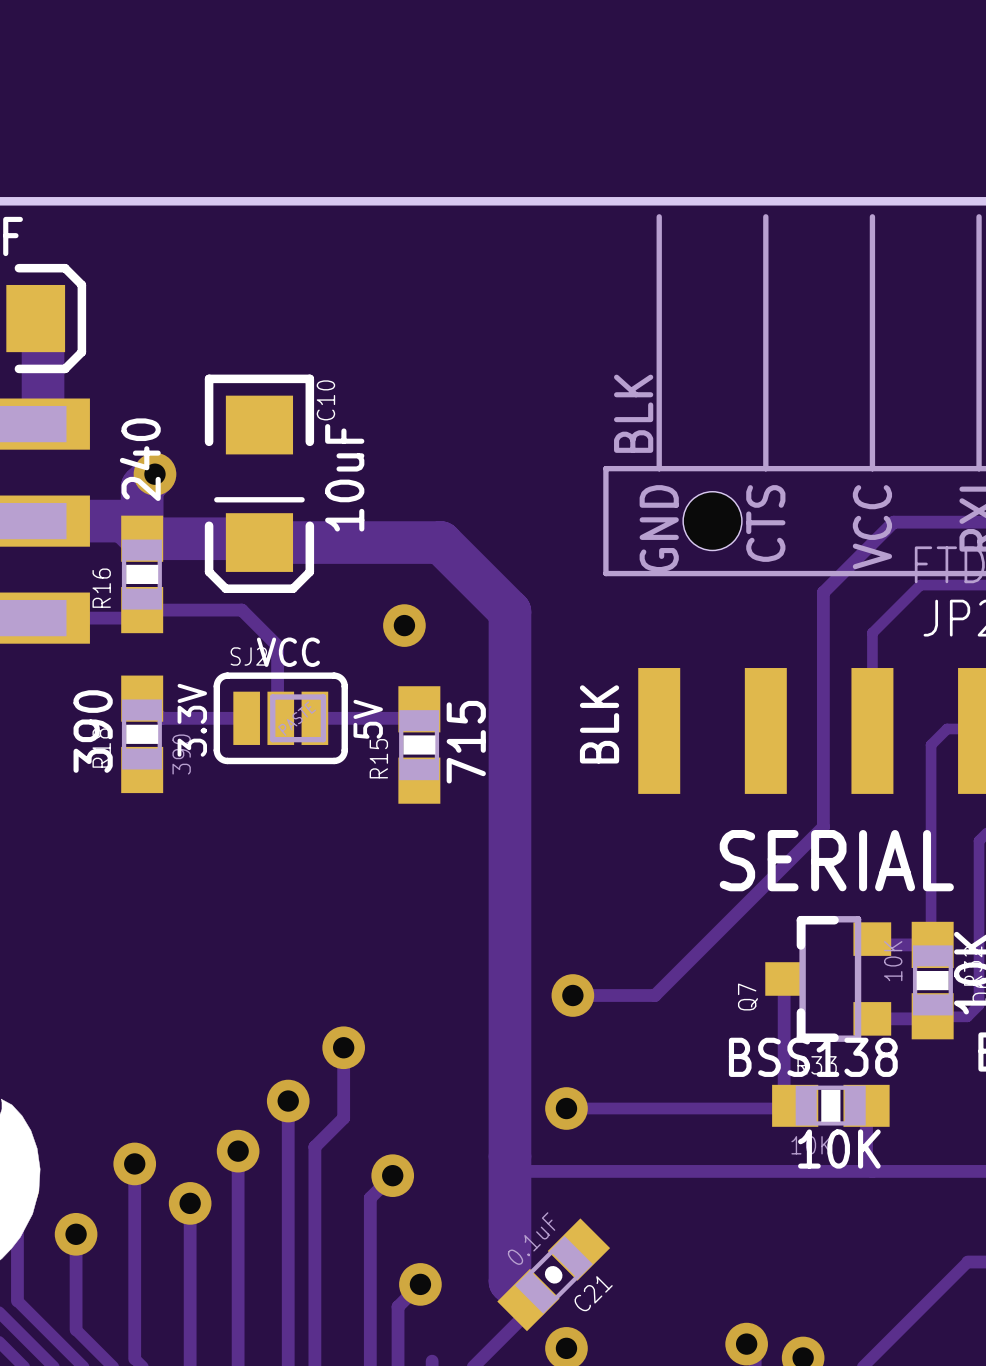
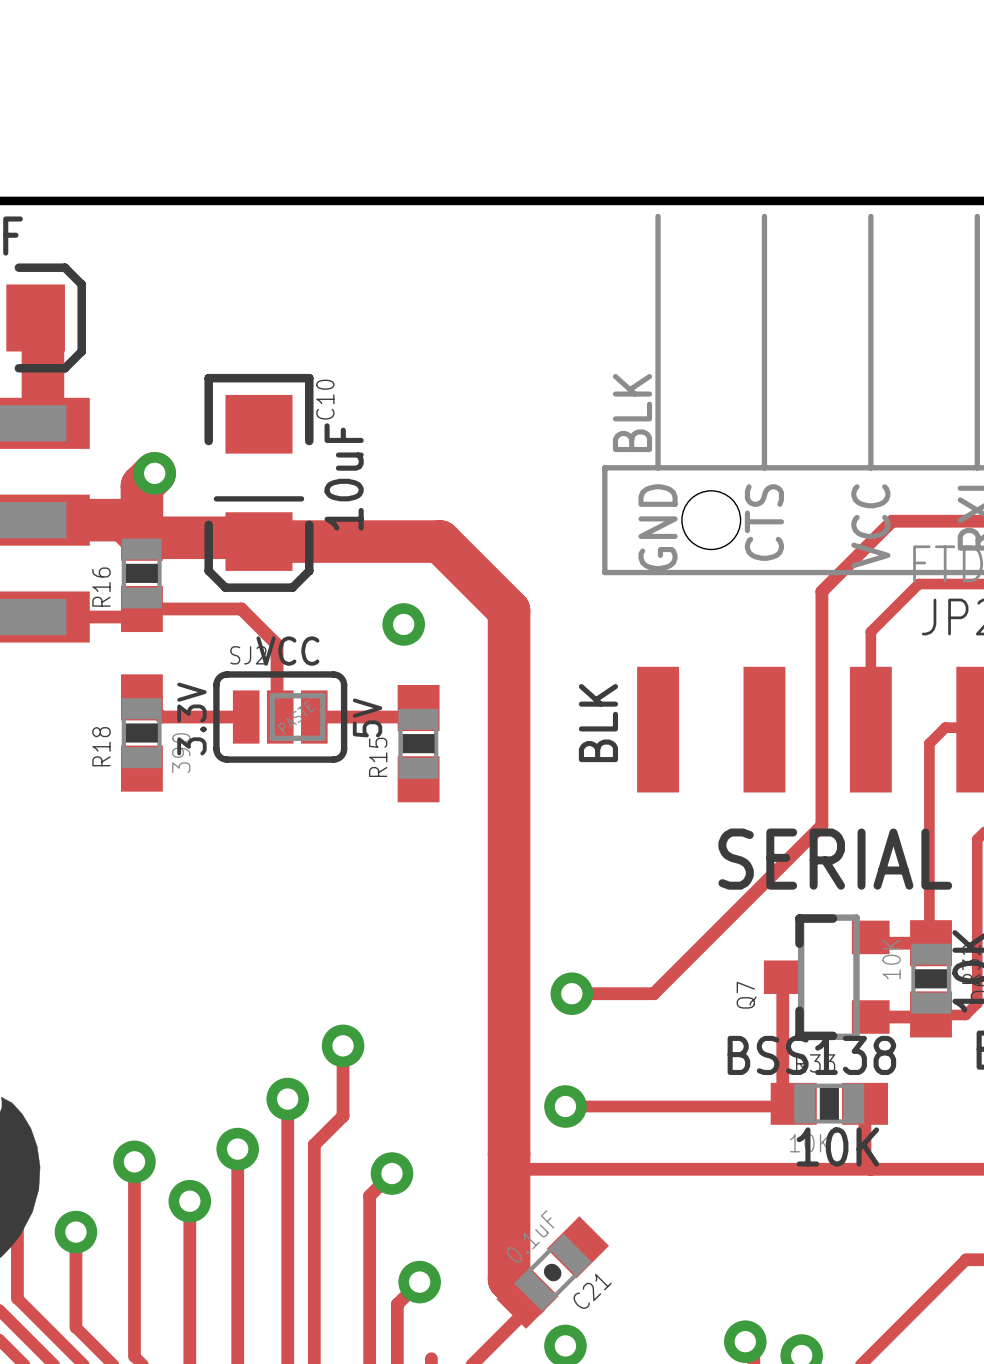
text: 240 (140, 459) -> none
text: 390 (93, 731) -> none
text: 715 (466, 742) -> none

